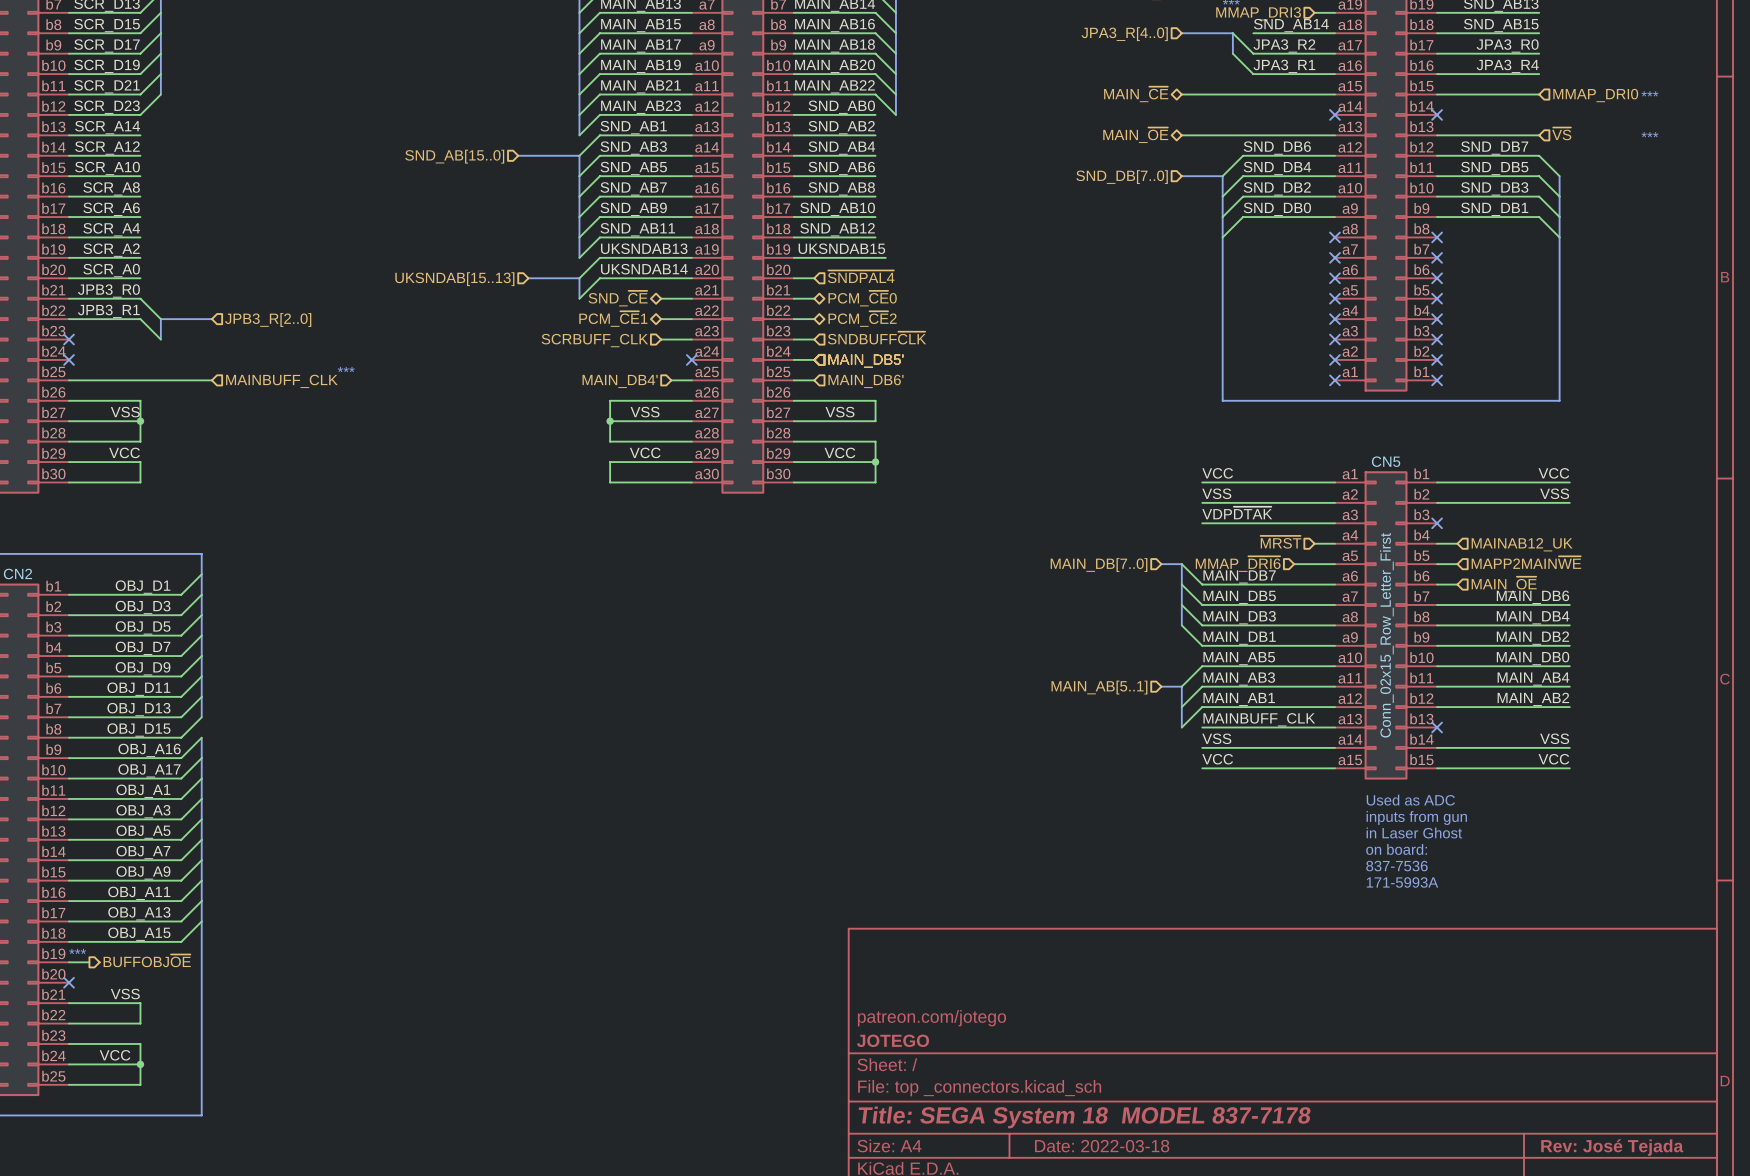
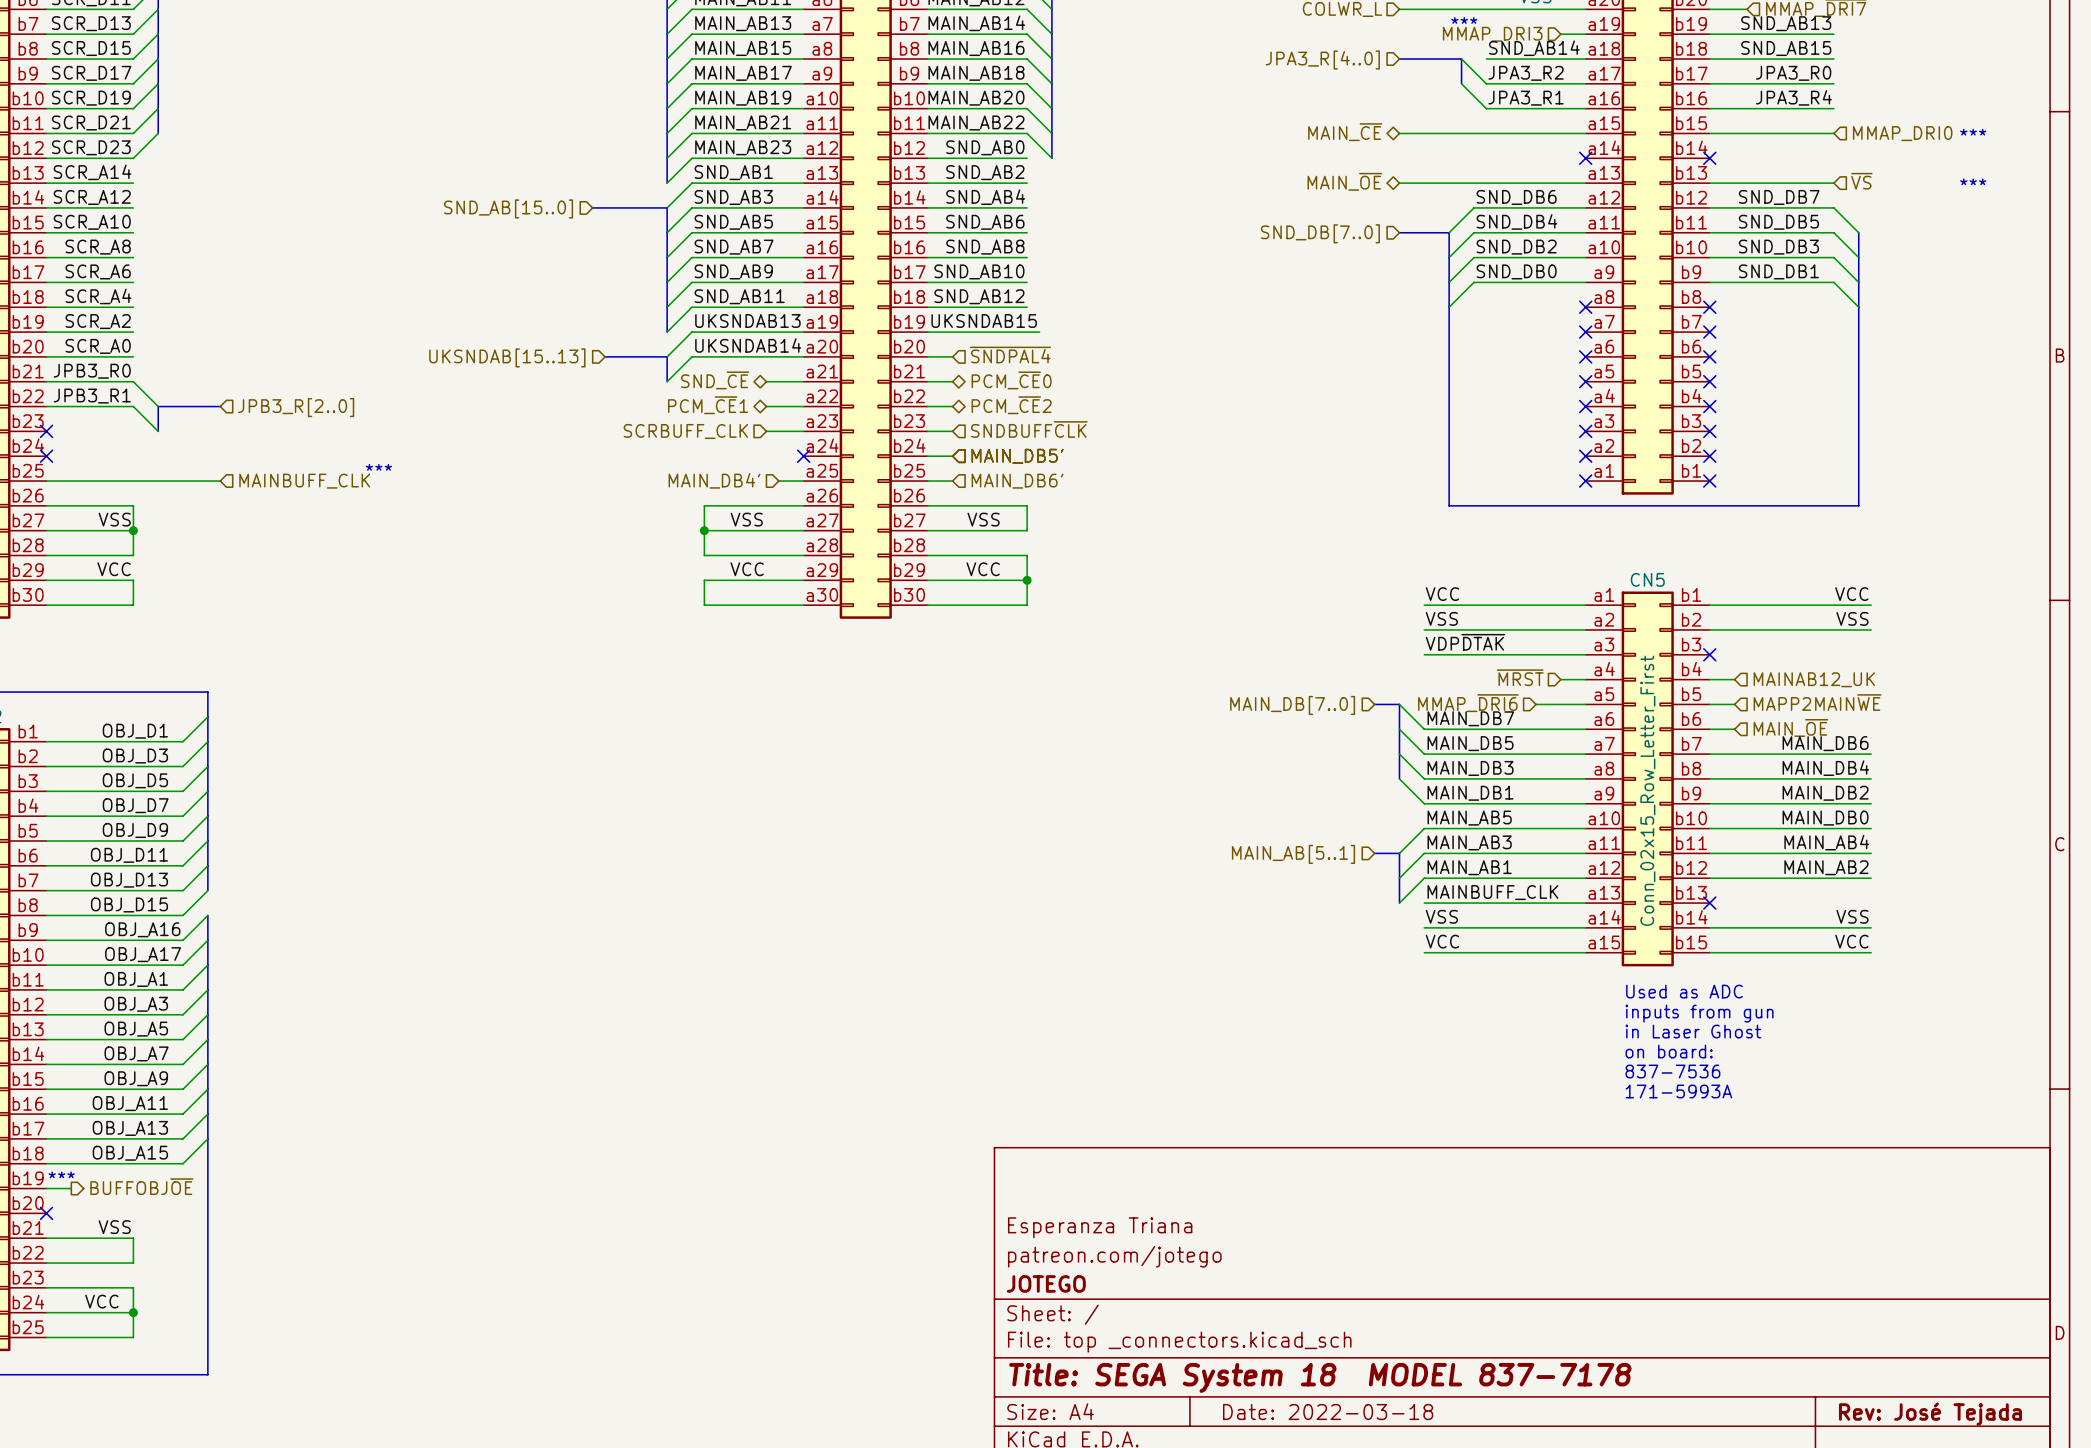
title block: none -> Esperanza Triana (1100, 1227)

